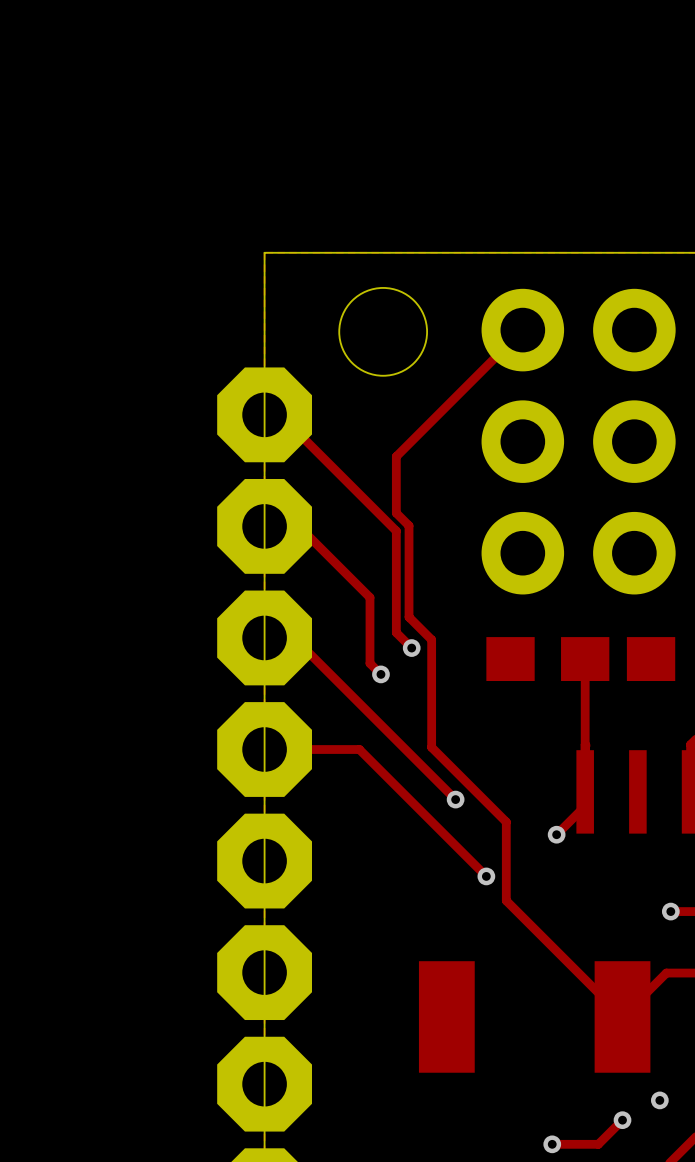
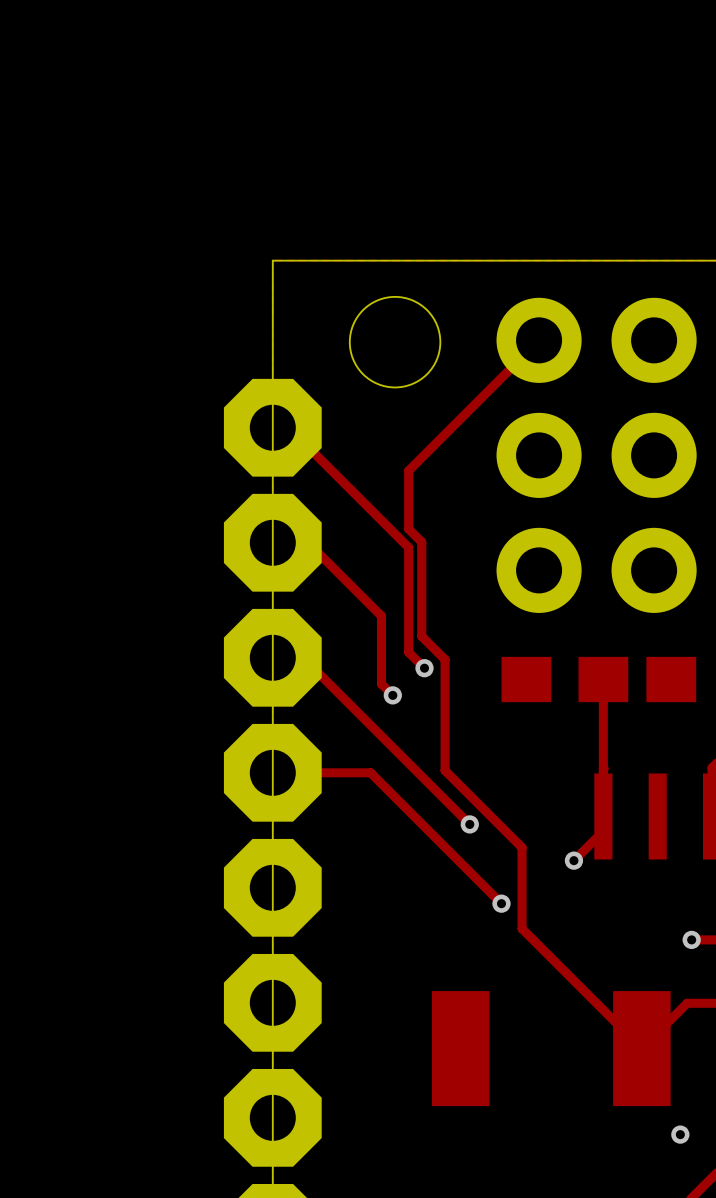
top track: (622, 1120) (598, 1144) (552, 1144) -> none
via: (622, 1120) -> none
via: (552, 1144) -> none

